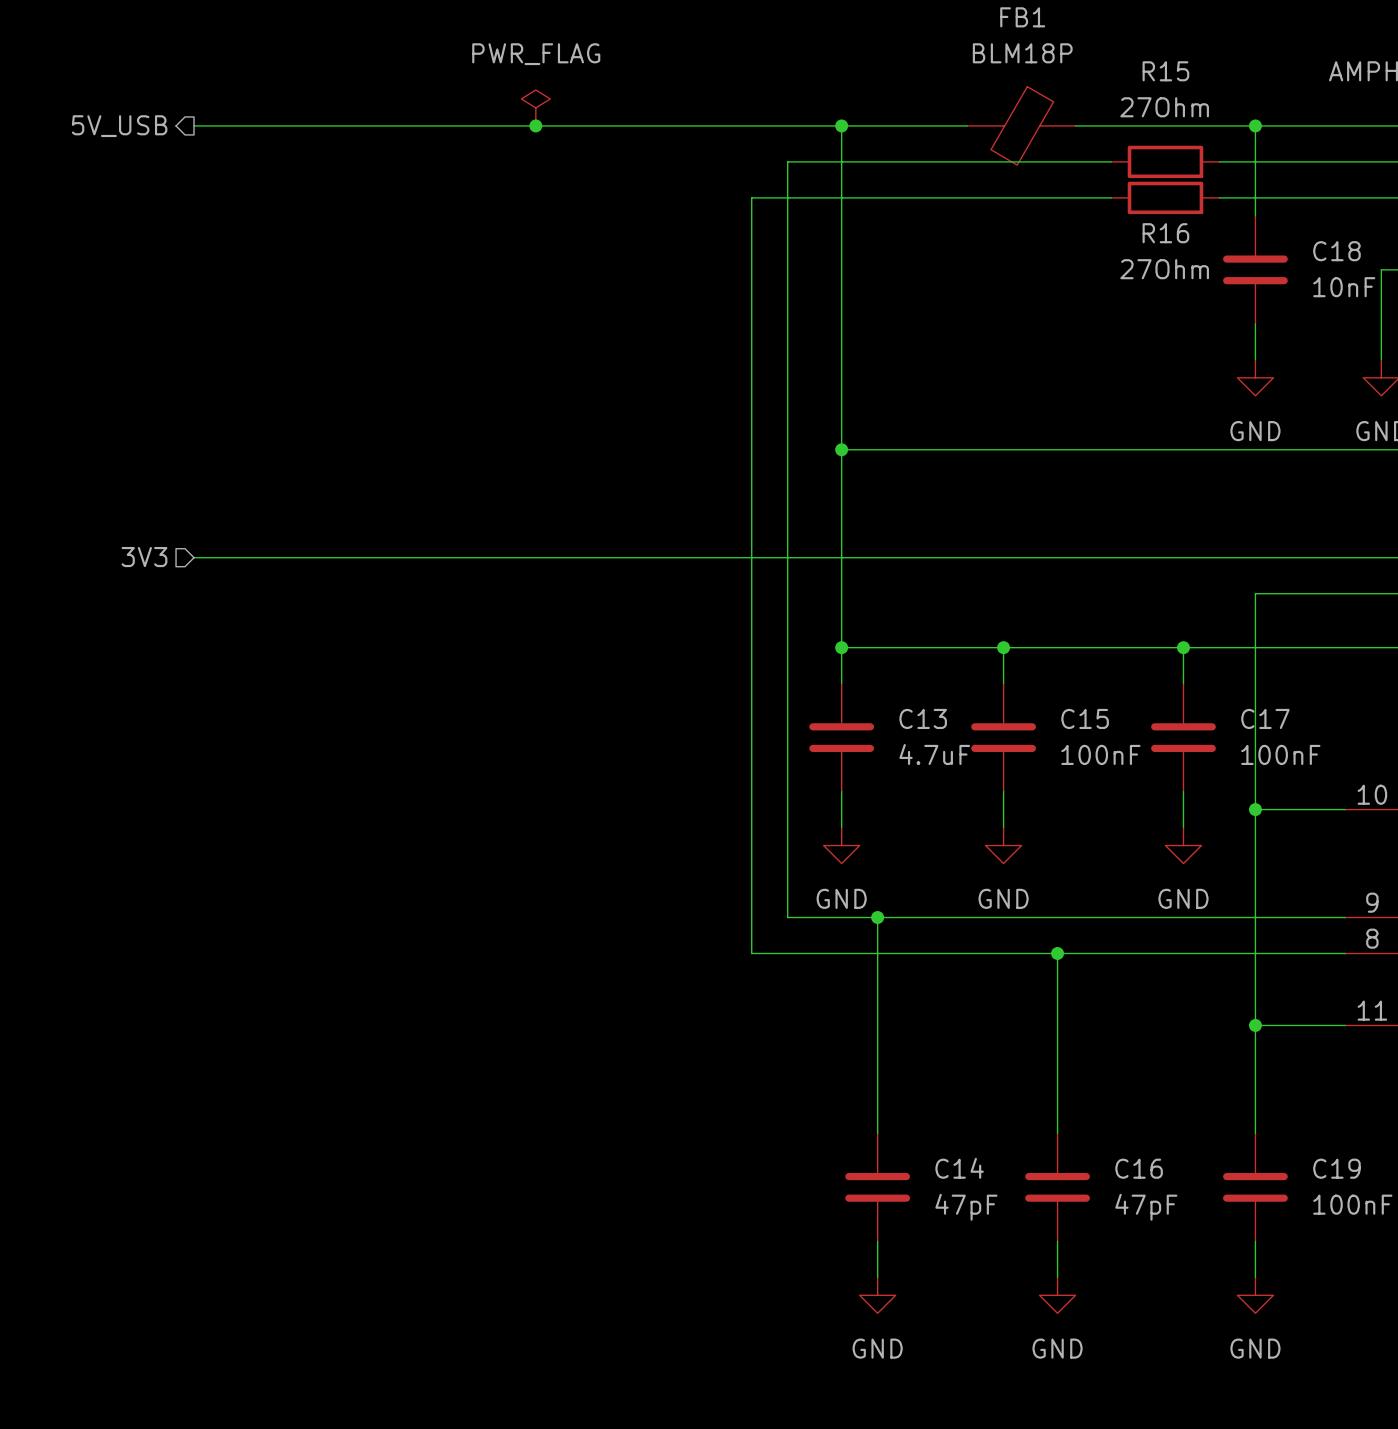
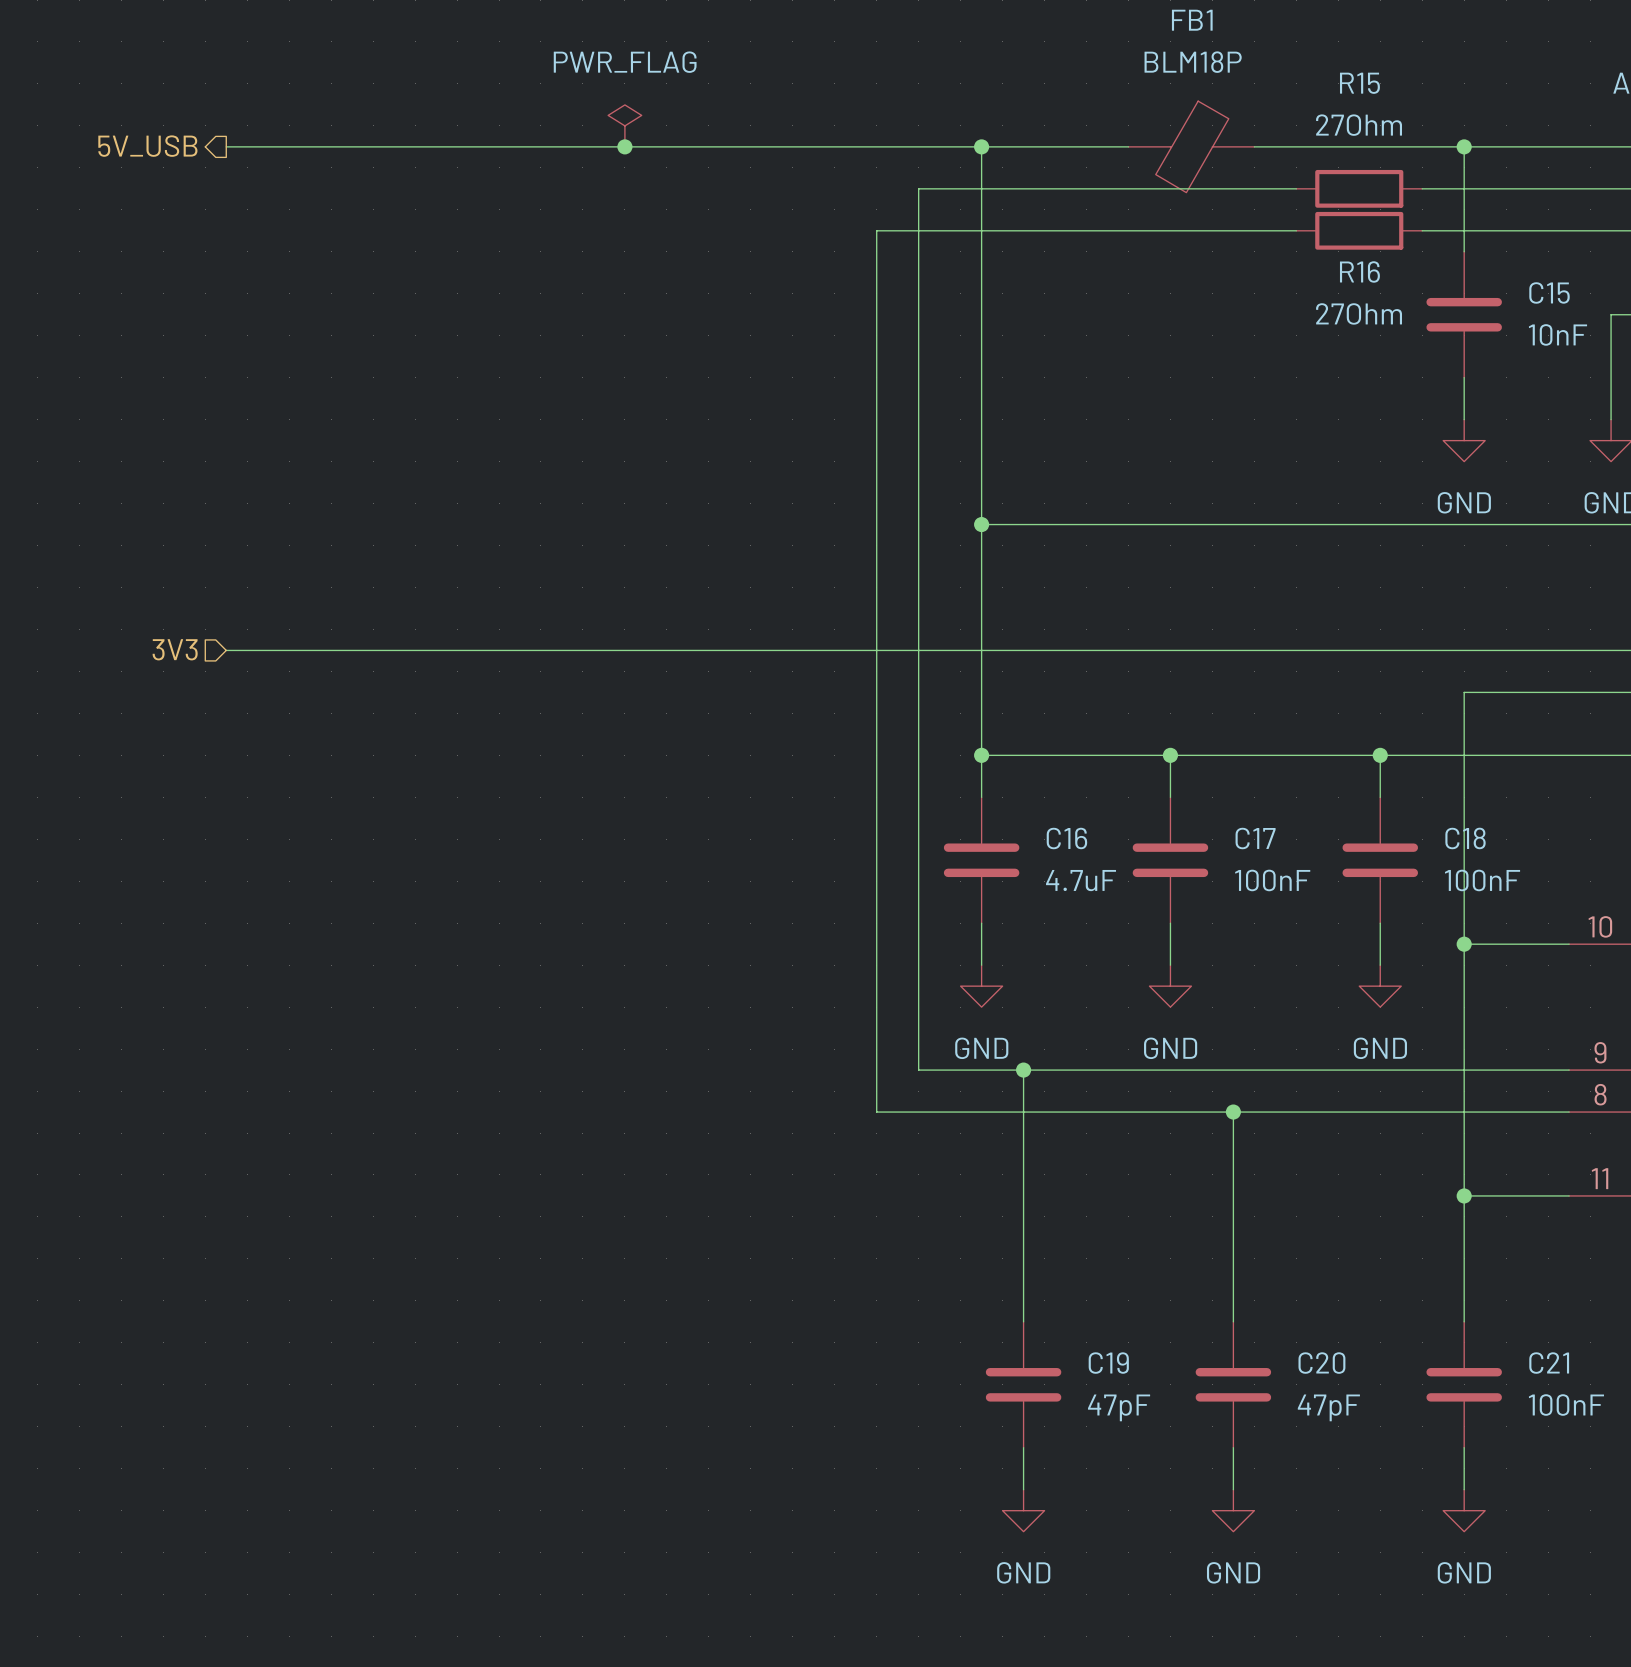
C18 name: C18 (1336, 251) -> C15 (1549, 292)
C13 name: C13 (923, 718) -> C16 (1066, 838)
C15 name: C15 (1085, 718) -> C17 (1255, 838)
C17 name: C17 (1265, 718) -> C18 (1465, 838)
C14 name: C14 (959, 1168) -> C19 (1108, 1363)
C16 name: C16 (1139, 1168) -> C20 (1321, 1363)
C19 name: C19 (1336, 1168) -> C21 (1549, 1363)

